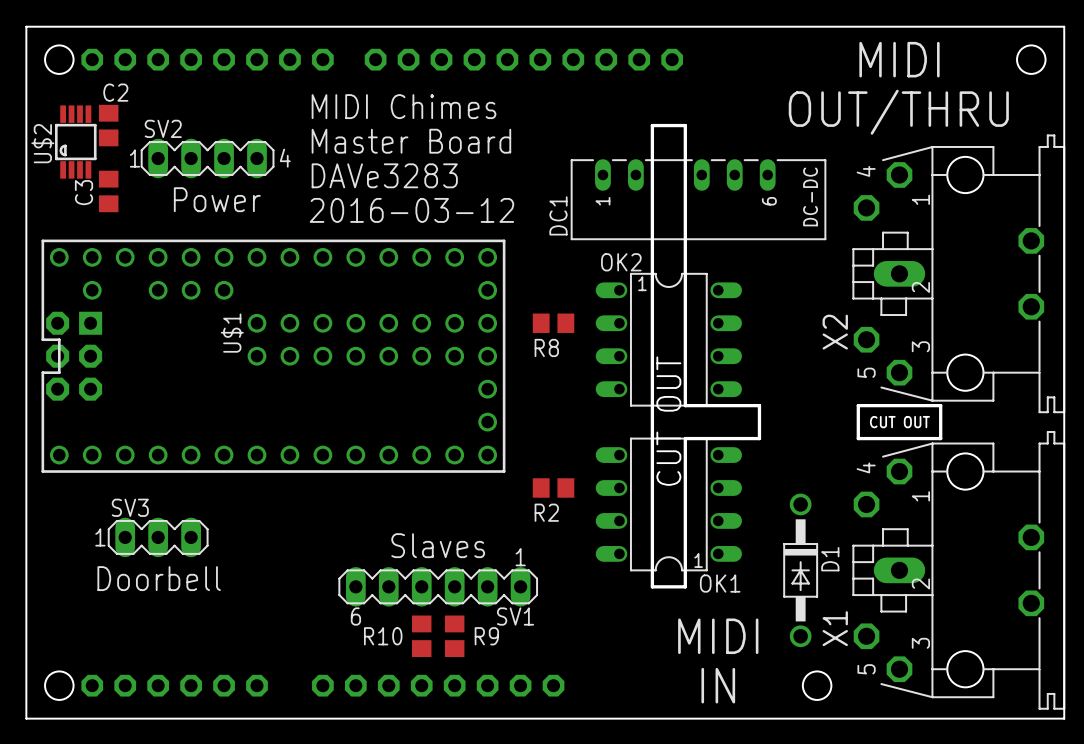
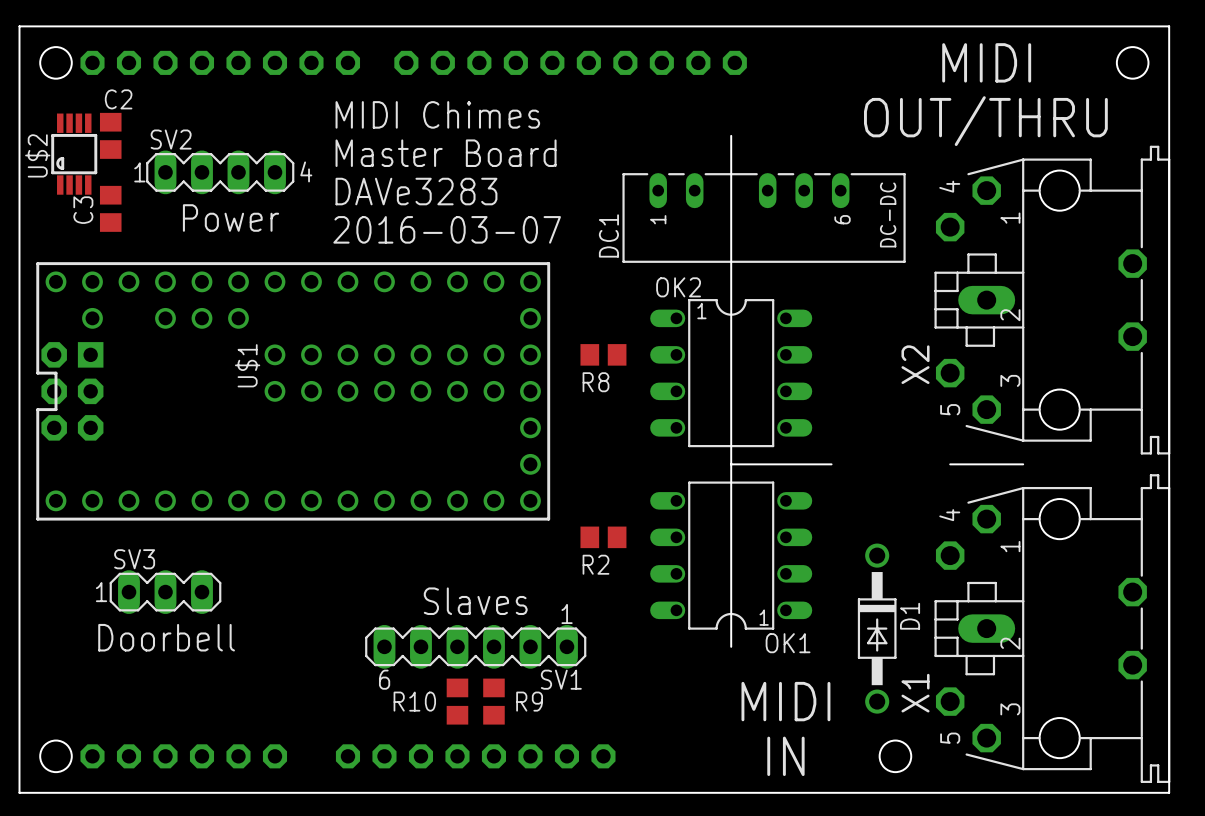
board edge: (652, 125) (685, 125) (685, 405) (759, 405) (759, 438) (685, 438) (685, 586) (652, 586) (652, 125) -> none
board edge: none -> (731, 135) (731, 646)
text: 2016-03-12 (411, 210) -> 2016-03-07 (447, 229)
board edge: (858, 405) (940, 405) (940, 438) (858, 438) (858, 405) -> none
text: CUT OUT (668, 421) -> none
board edge: none -> (731, 464) (831, 464)
board edge: none -> (950, 464) (1023, 464)
text: CUT OUT (899, 422) -> none

